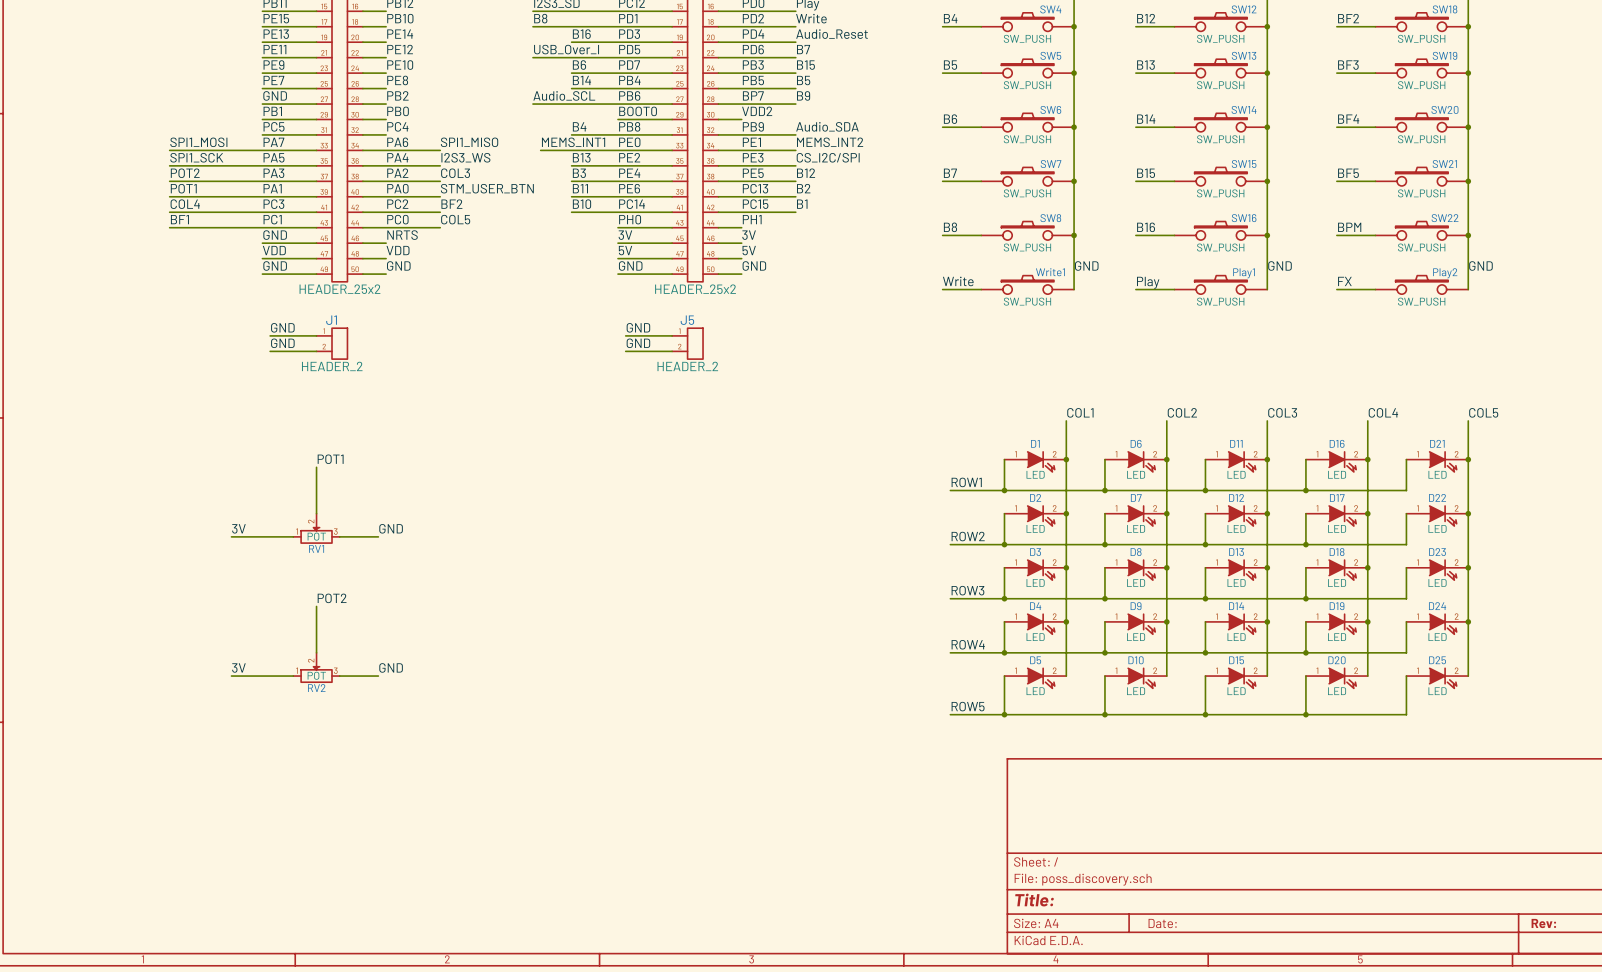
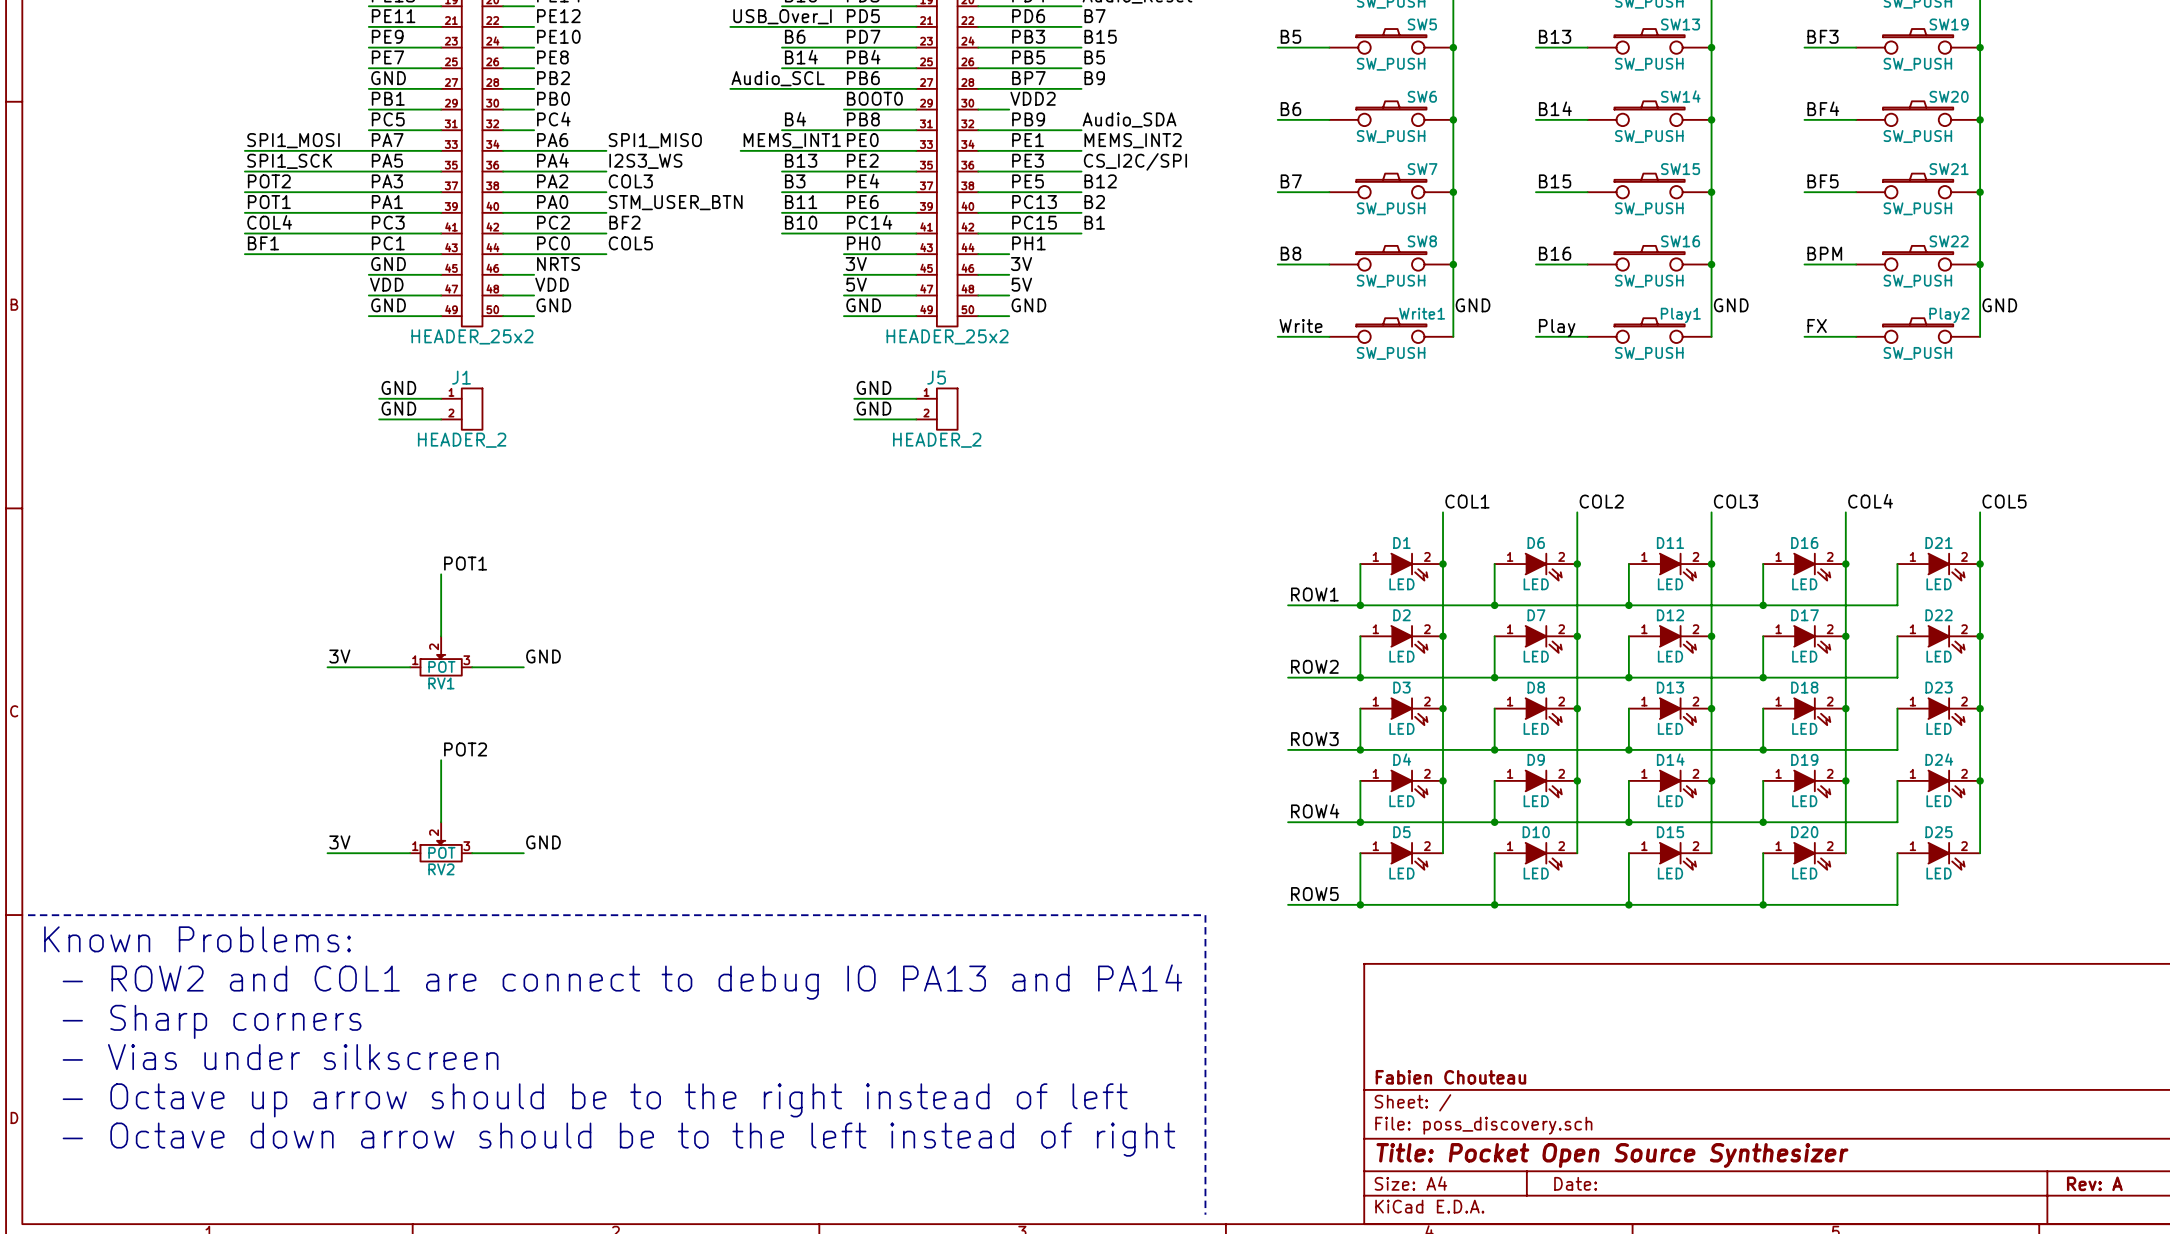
line: none -> (28, 915) (1205, 915) (1205, 1214)
text: none -> Known Problems: (197, 939)
text: none -> - ROW2 and COL1 are connect to debug IO PA13 and PA14 (622, 982)
text: none -> - Sharp corners (212, 1021)
text: none -> - Vias under silkscreen (280, 1057)
title block: none -> Fabien Chouteau (1450, 1077)
text: none -> - Octave up arrow should be to the right instead of left (595, 1100)
text: none -> - Octave down arrow should be to the left instead of right (618, 1139)
title block: Title: (1034, 900) -> Title: Pocket Open Source Synthesizer (1612, 1155)
title block: Rev: (1543, 923) -> Rev: A (2094, 1183)

